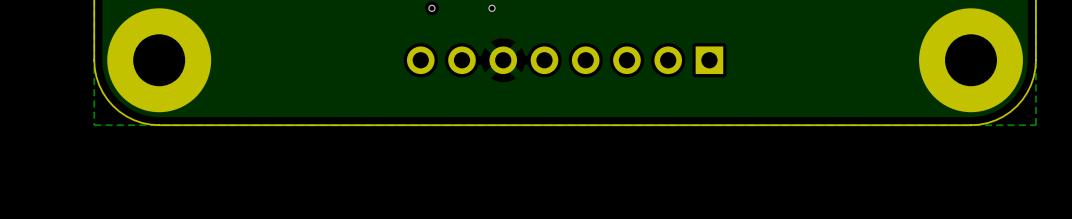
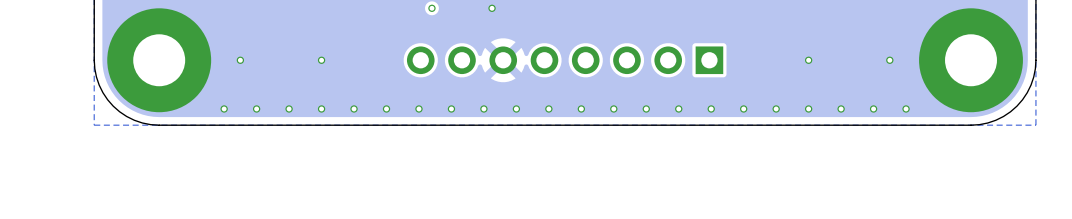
via: none -> (240, 60)
via: none -> (321, 60)
via: none -> (808, 60)
via: none -> (889, 60)
via: none -> (224, 108)
via: none -> (256, 108)
via: none -> (289, 108)
via: none -> (321, 108)
via: none -> (354, 108)
via: none -> (386, 108)
via: none -> (418, 108)
via: none -> (451, 108)
via: none -> (483, 108)
via: none -> (516, 108)
via: none -> (548, 108)
via: none -> (581, 108)
via: none -> (613, 108)
via: none -> (646, 108)
via: none -> (678, 108)
via: none -> (711, 108)
via: none -> (743, 108)
via: none -> (776, 108)
via: none -> (808, 108)
via: none -> (841, 108)
via: none -> (873, 108)
via: none -> (906, 108)

